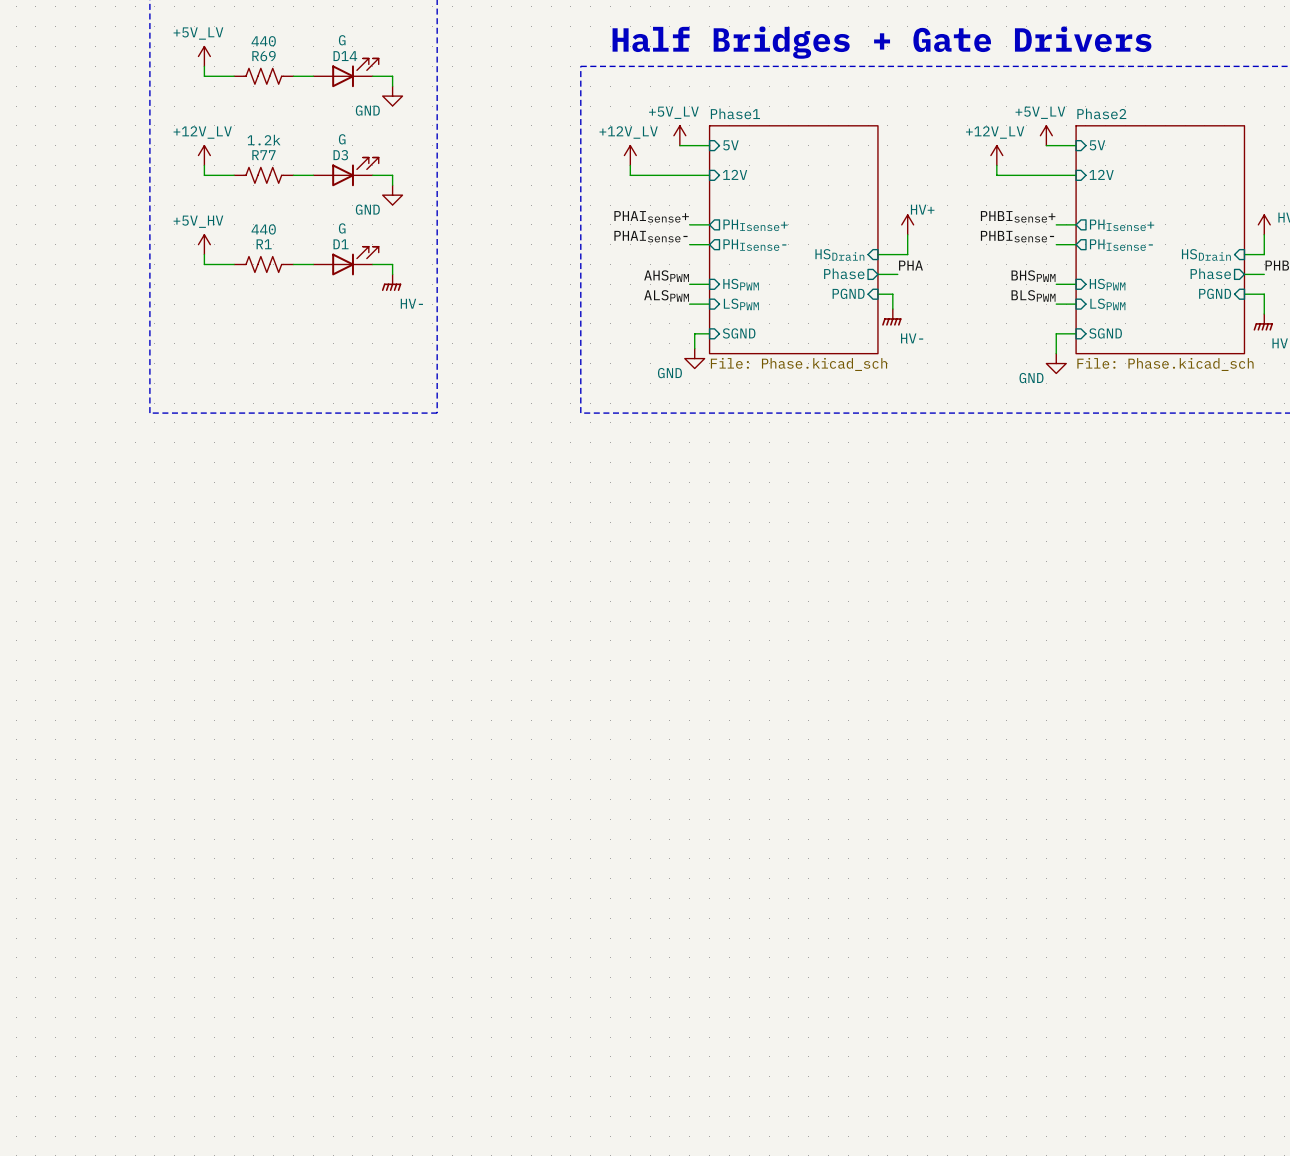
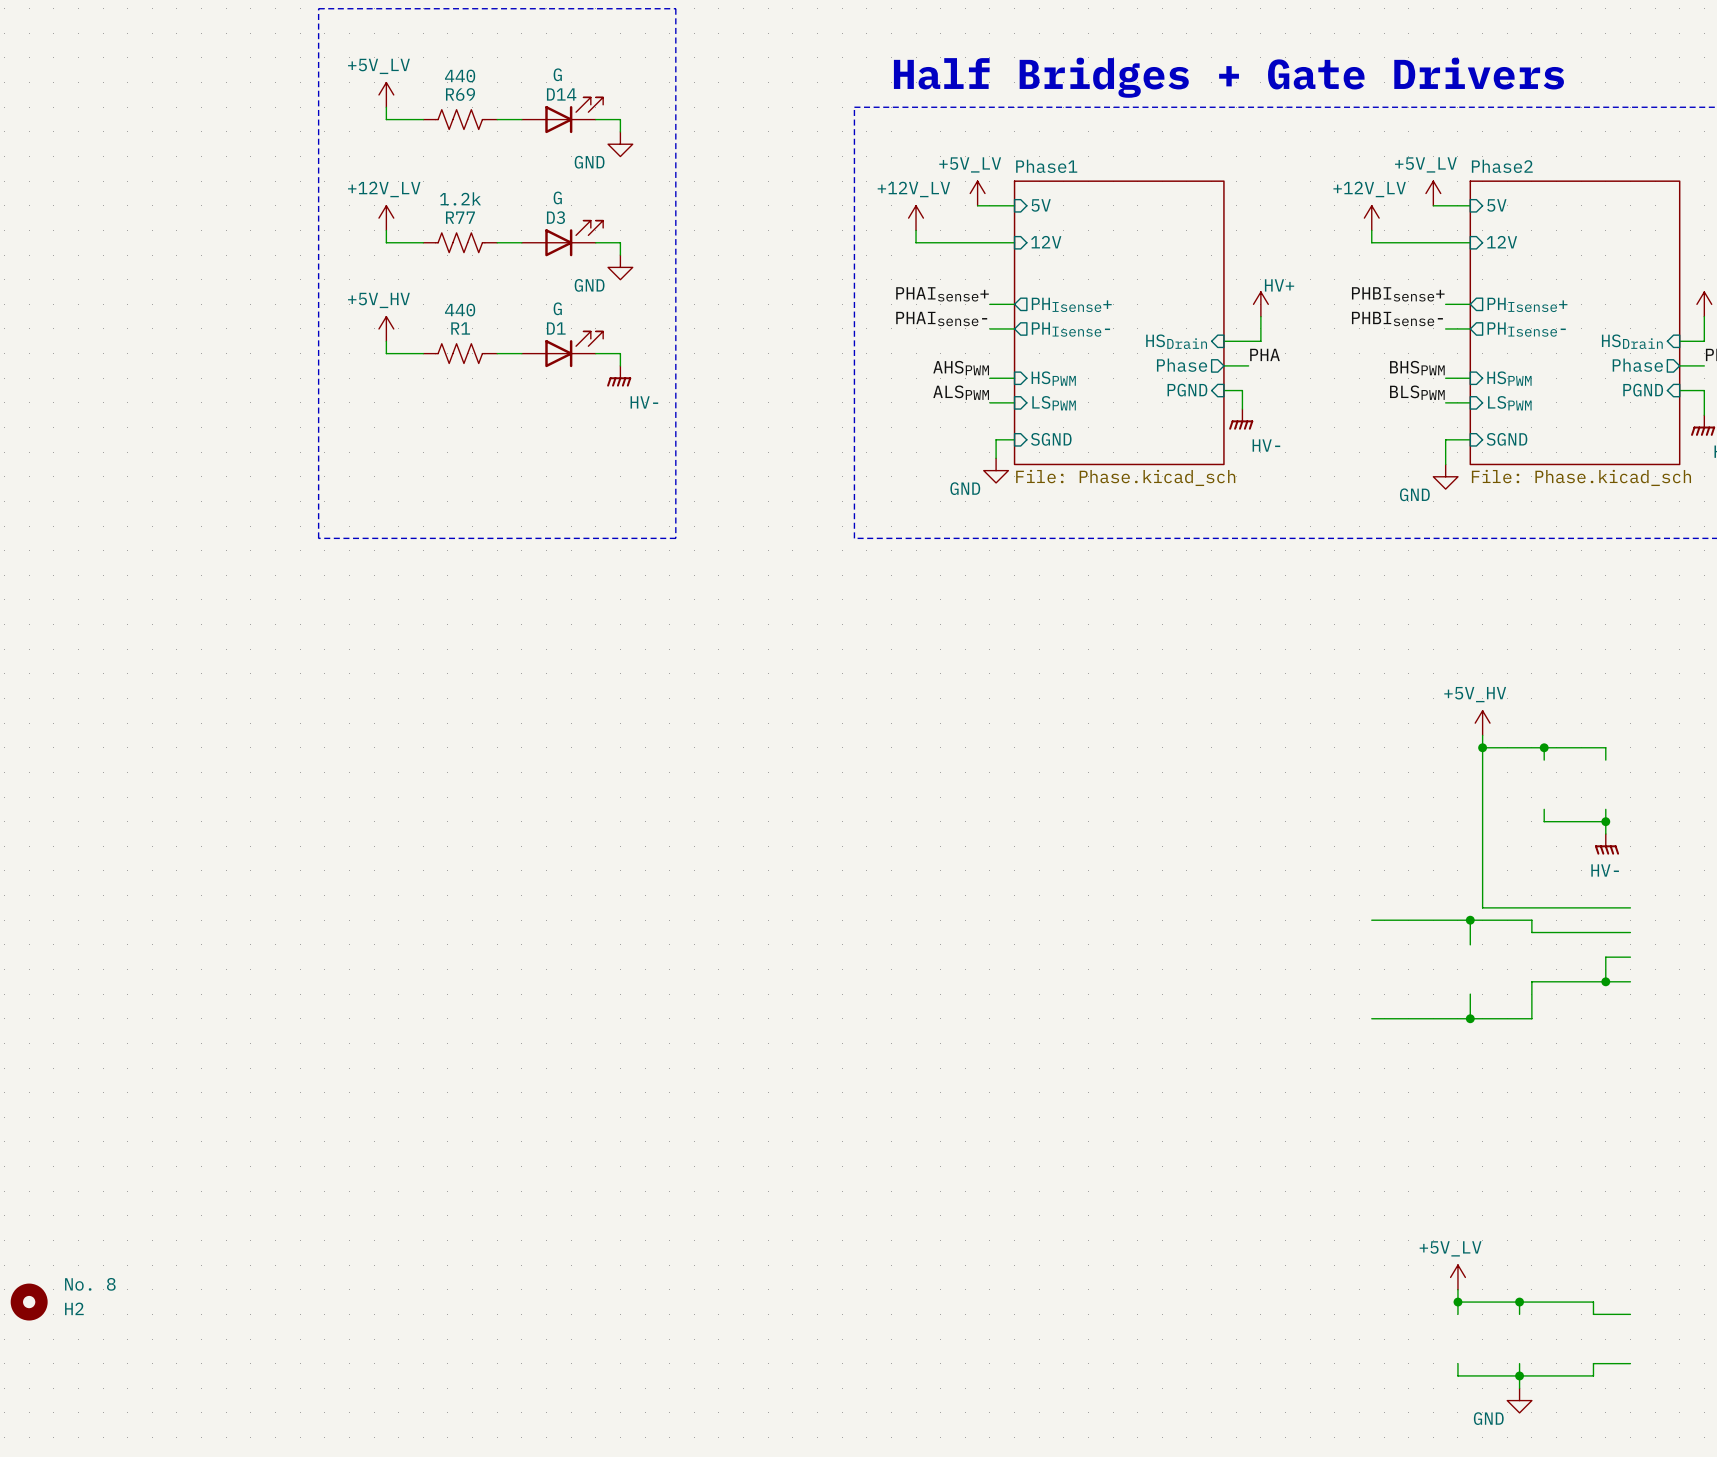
power symbol: none -> +5V_HV (1482, 723)
wire: none -> (1482, 735) (1482, 907) (1630, 907)
wire: none -> (1482, 747) (1605, 747) (1605, 760)
junction: none -> (1482, 747)
wire: none -> (1544, 747) (1544, 760)
junction: none -> (1544, 747)
wire: none -> (1544, 809) (1544, 821) (1605, 821)
wire: none -> (1605, 809) (1605, 833)
junction: none -> (1605, 821)
power symbol: none -> HV- (1607, 844)
wire: none -> (1371, 920) (1531, 920) (1531, 932) (1630, 932)
wire: none -> (1470, 920) (1470, 944)
junction: none -> (1470, 920)
wire: none -> (1630, 957) (1605, 957) (1605, 981)
junction: none -> (1605, 981)
wire: none -> (1630, 981) (1531, 981) (1531, 1018) (1371, 1018)
wire: none -> (1470, 994) (1470, 1018)
junction: none -> (1470, 1018)
power symbol: none -> +5V_LV (1457, 1277)
wire: none -> (1457, 1289) (1457, 1314)
wire: none -> (1457, 1302) (1593, 1302) (1593, 1314) (1630, 1314)
junction: none -> (1457, 1302)
wire: none -> (1519, 1302) (1519, 1314)
junction: none -> (1519, 1302)
wire: none -> (1457, 1363) (1457, 1375) (1593, 1375) (1593, 1363) (1630, 1363)
wire: none -> (1519, 1363) (1519, 1388)
junction: none -> (1519, 1375)
power symbol: none -> GND (1519, 1400)

